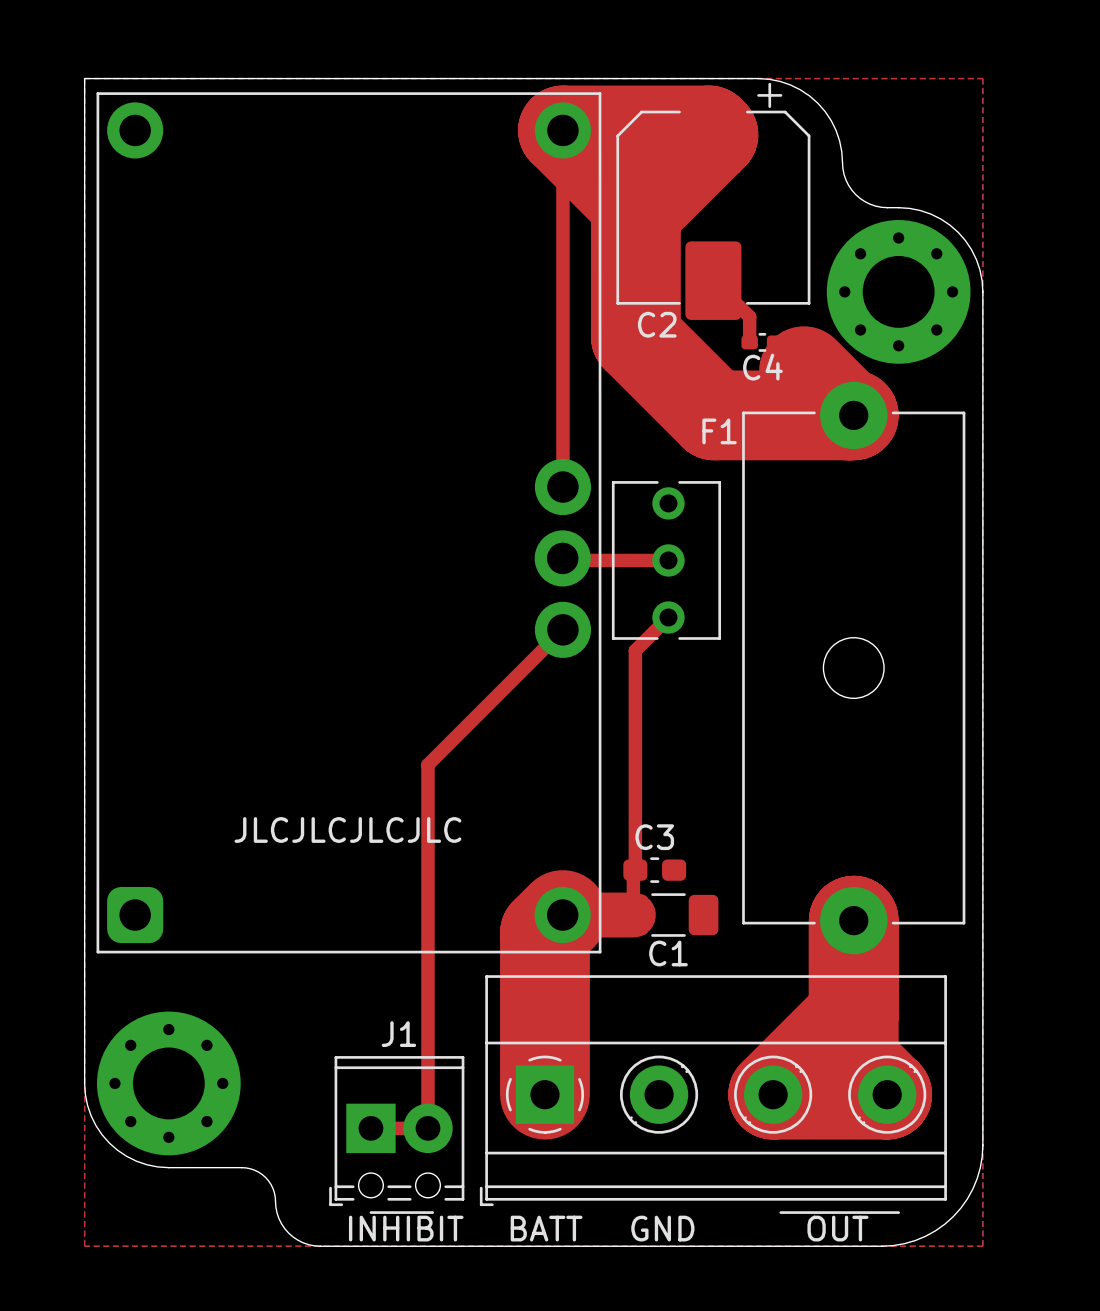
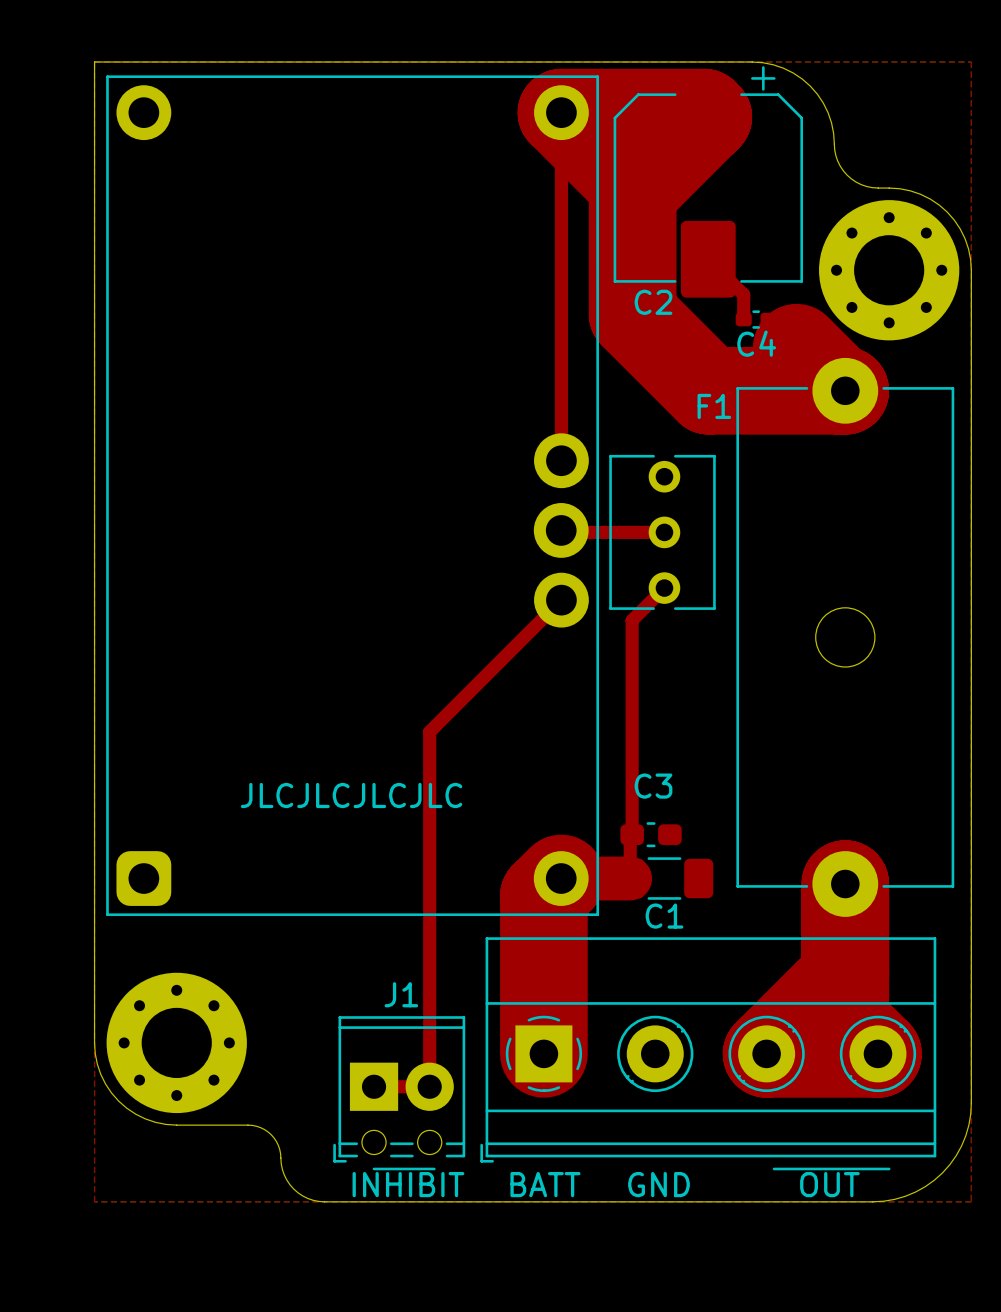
C3 name position: C3 (654, 837) -> C3 (653, 786)

